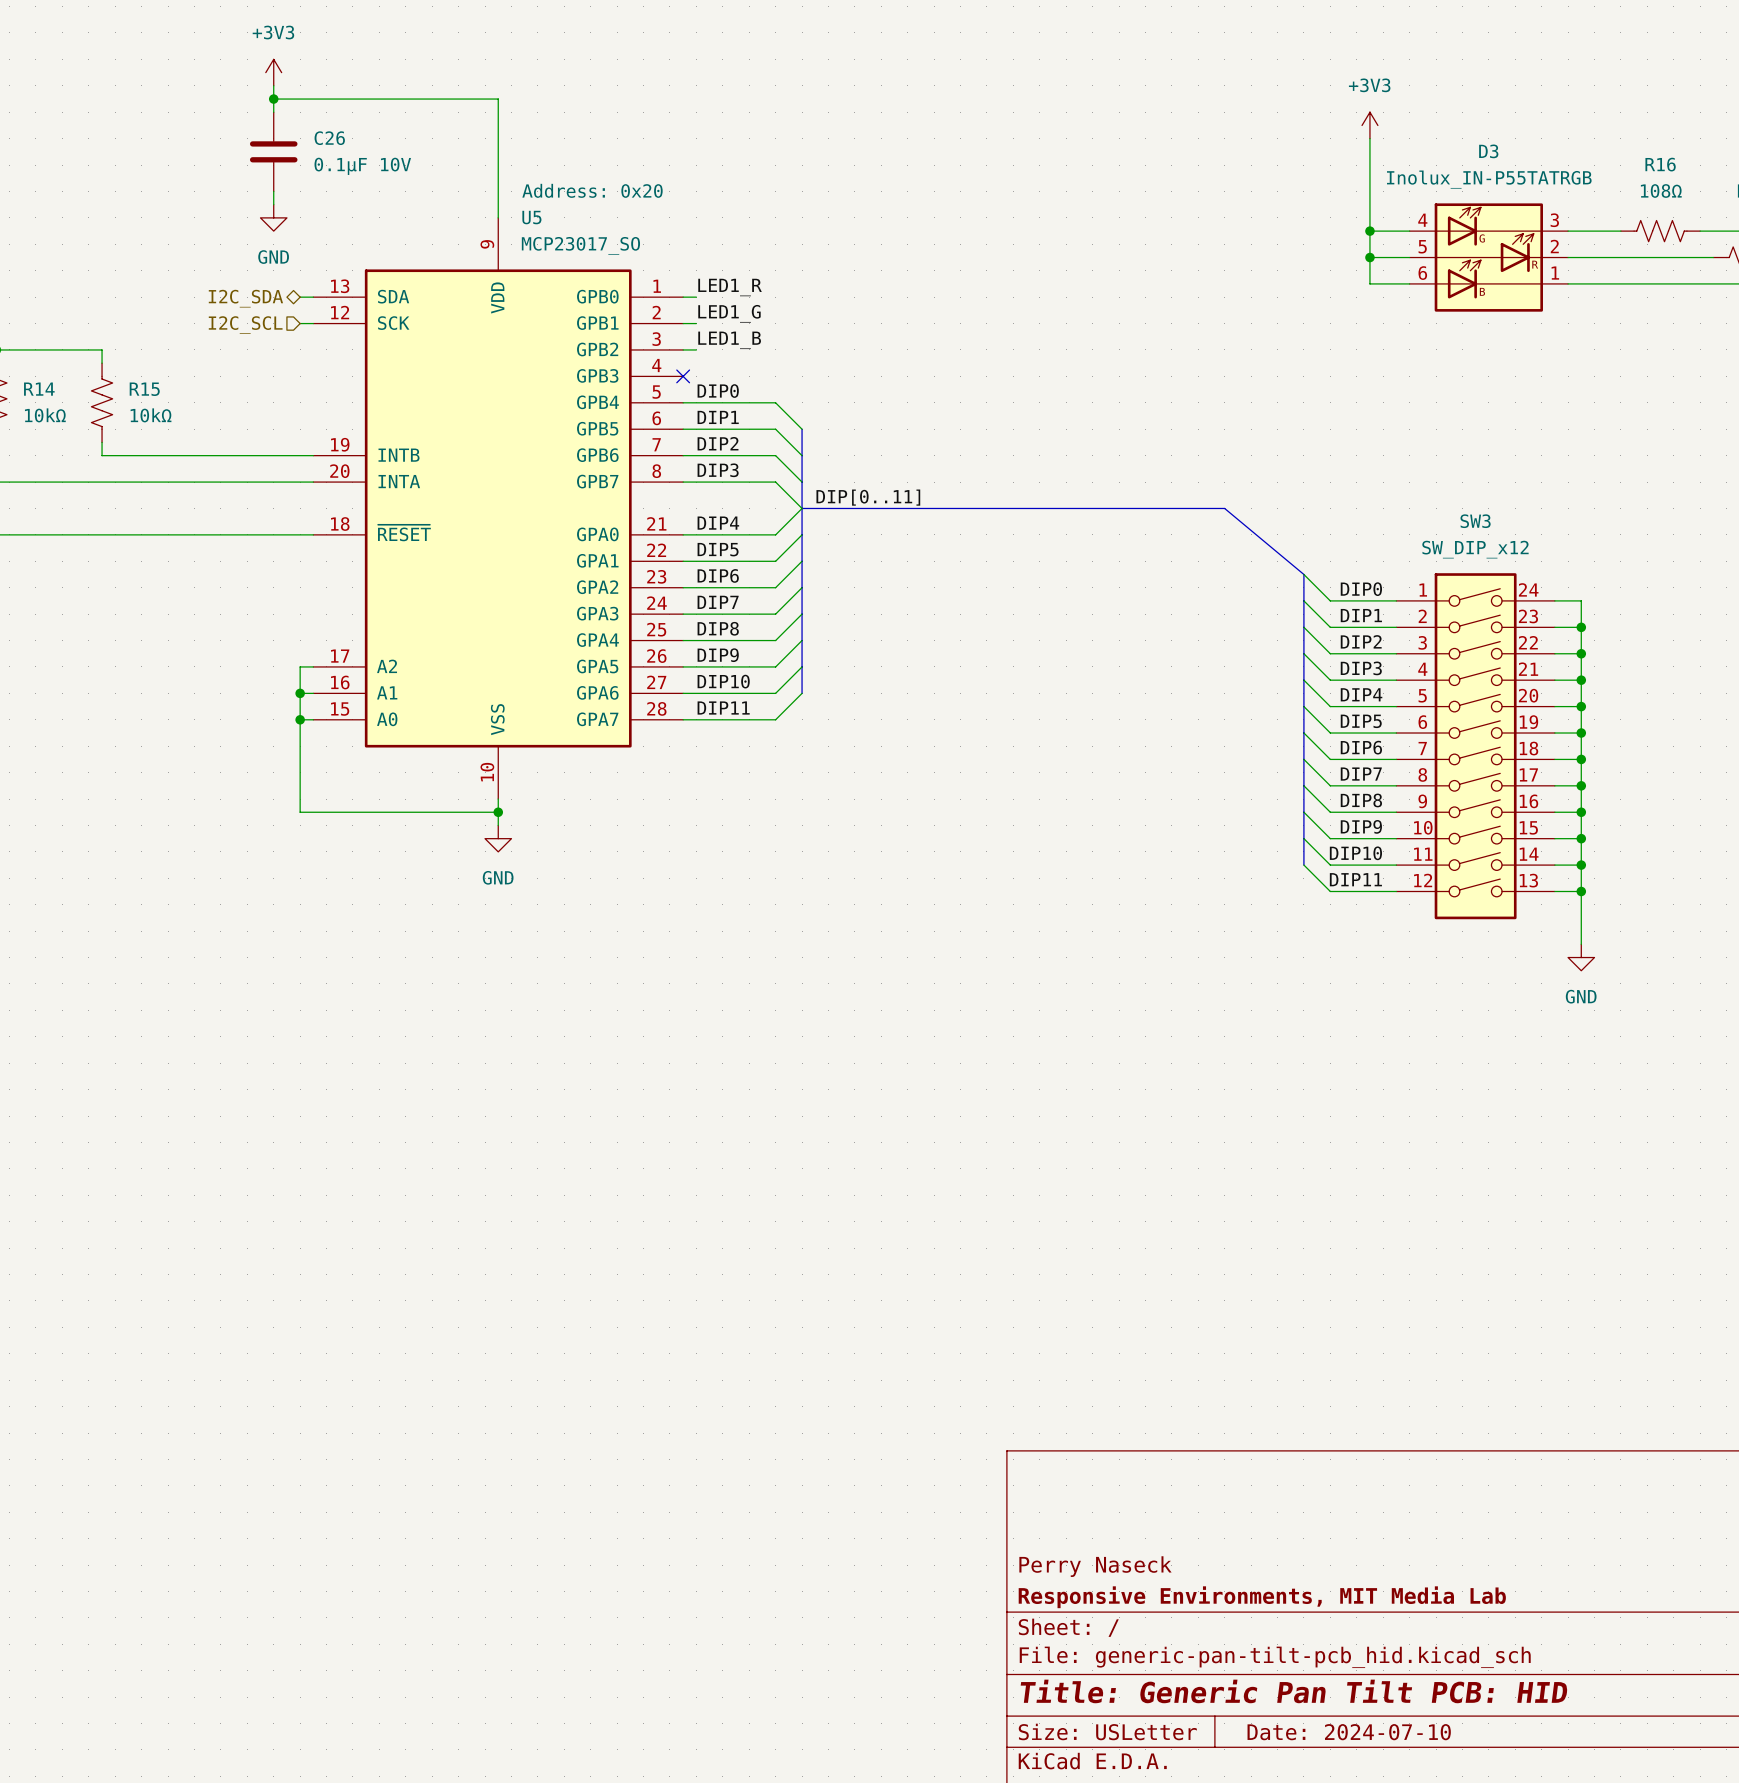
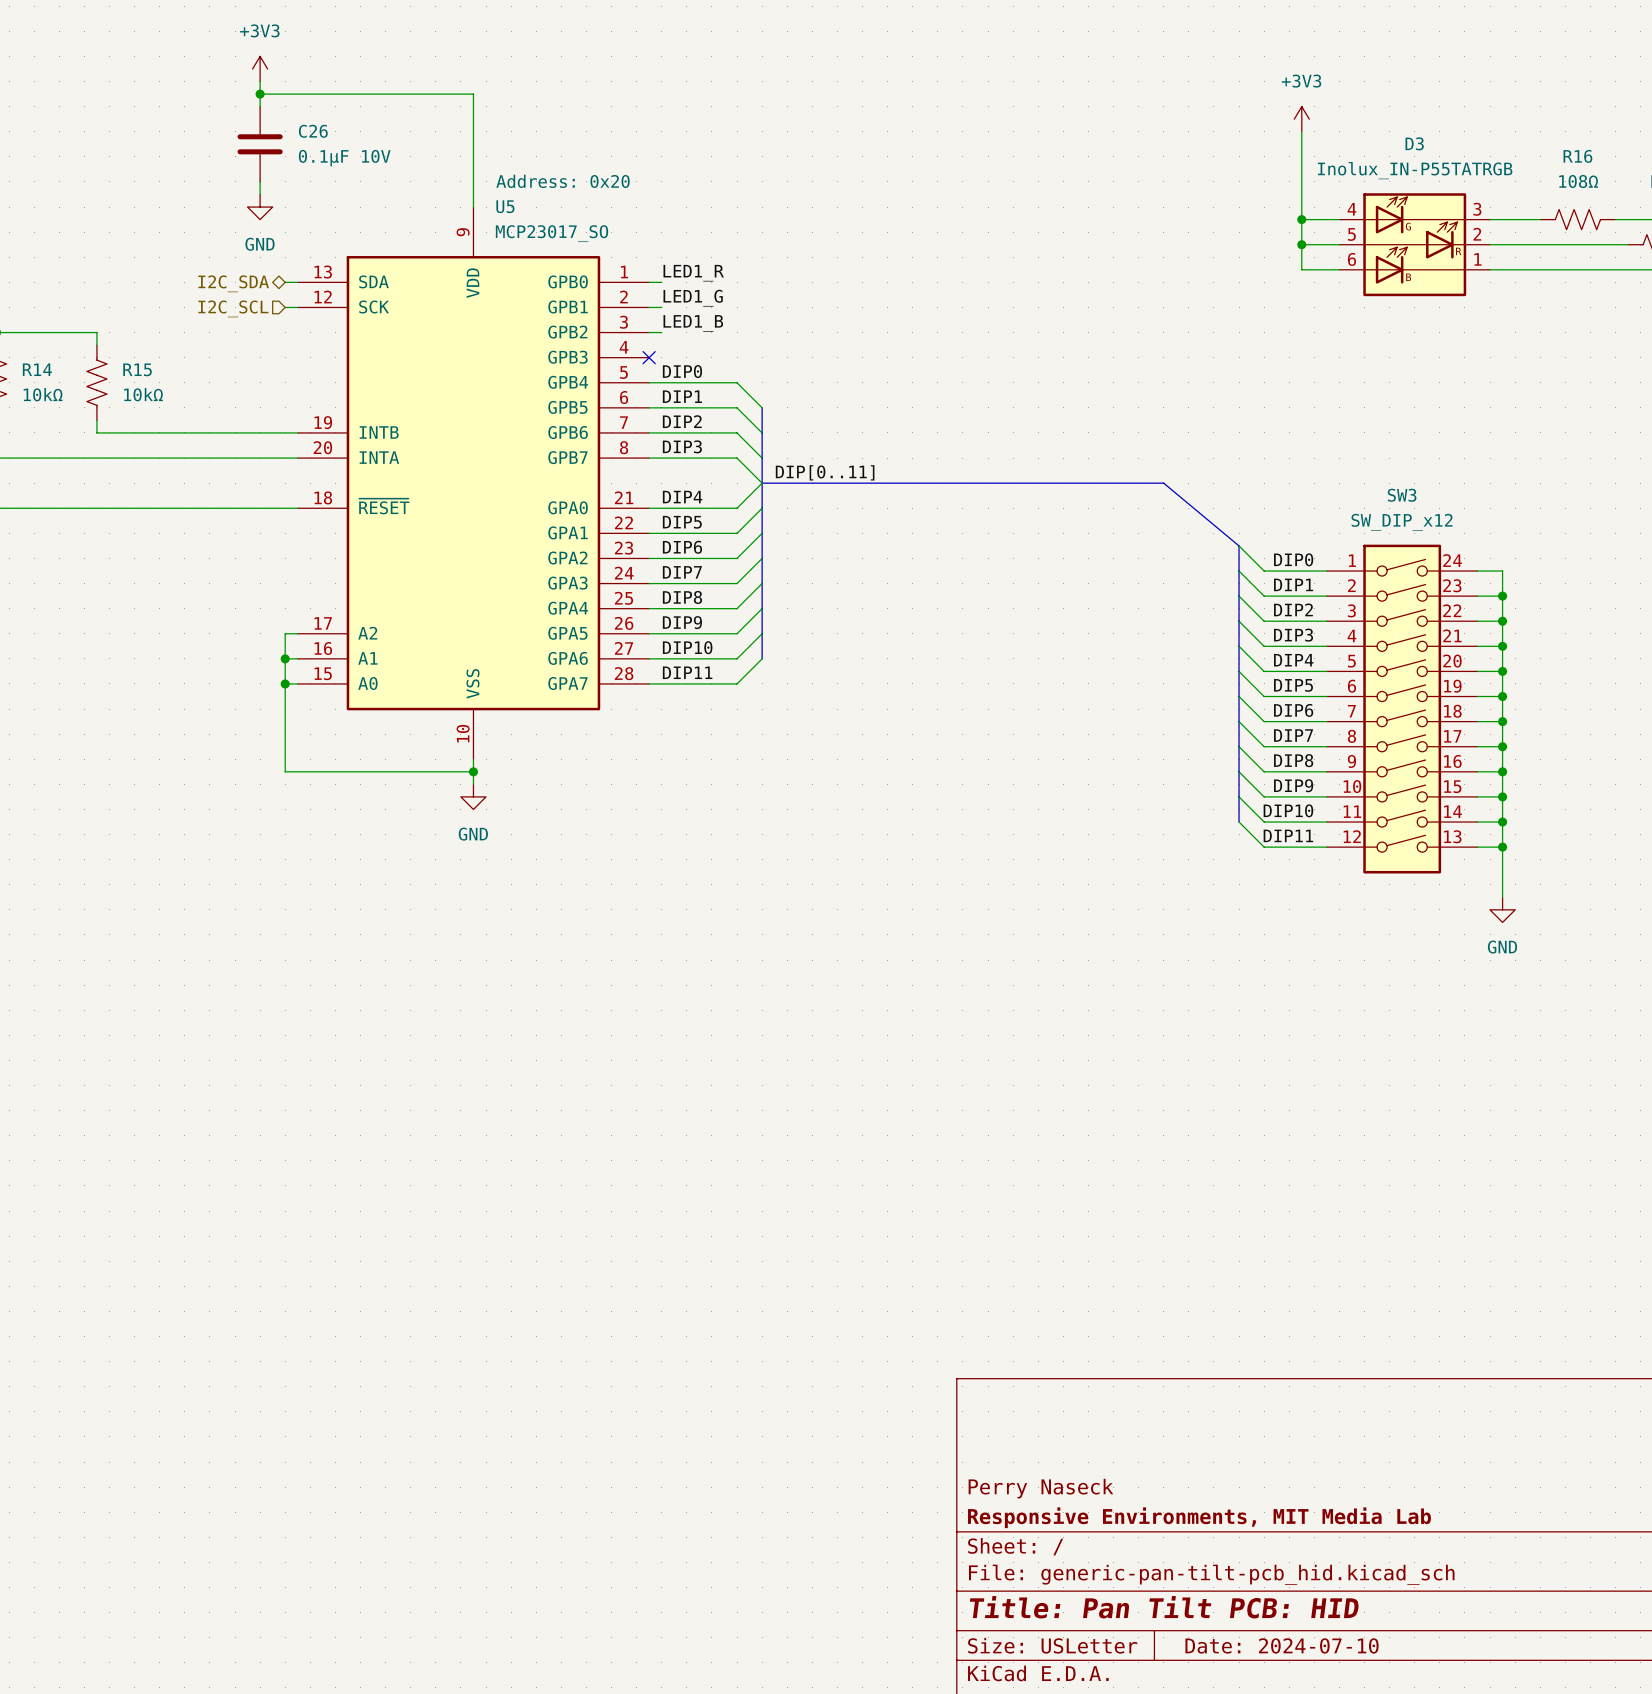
title block: Title: Generic Pan Tilt PCB: HID (1294, 1691) -> Title: Pan Tilt PCB: HID (1164, 1607)

